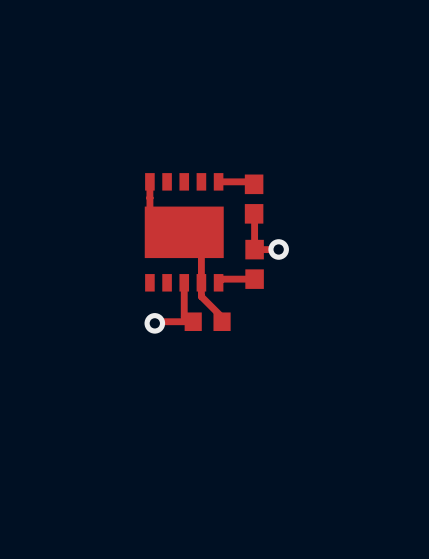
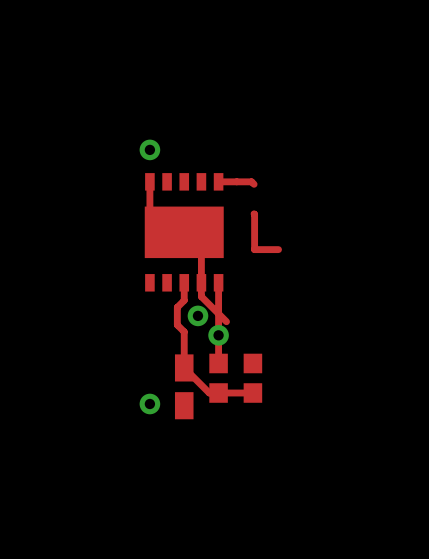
via: none -> (149, 149)
part: (254, 199) -> none
via: (278, 249) -> none
part: (254, 264) -> none
top track: (254, 279) (222, 279) (218, 282) -> (218, 363) (218, 282)
top track: (184, 300) (184, 317) (188, 321) (156, 321) (154, 323) -> (184, 300) (177, 307) (177, 324) (184, 331) (184, 367) (209, 393) (252, 393)
via: none -> (197, 315)
part: (207, 321) -> none
via: (154, 323) -> none
via: none -> (218, 335)
part: none -> (218, 378)
part: none -> (252, 378)
part: none -> (184, 386)
via: none -> (149, 403)

